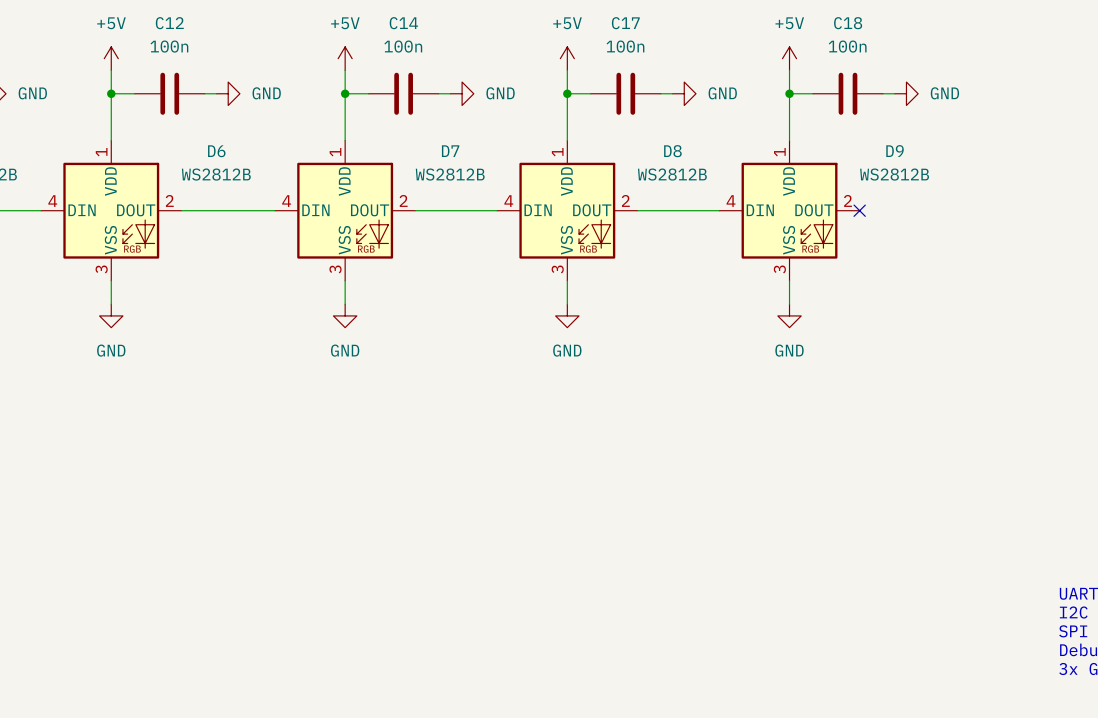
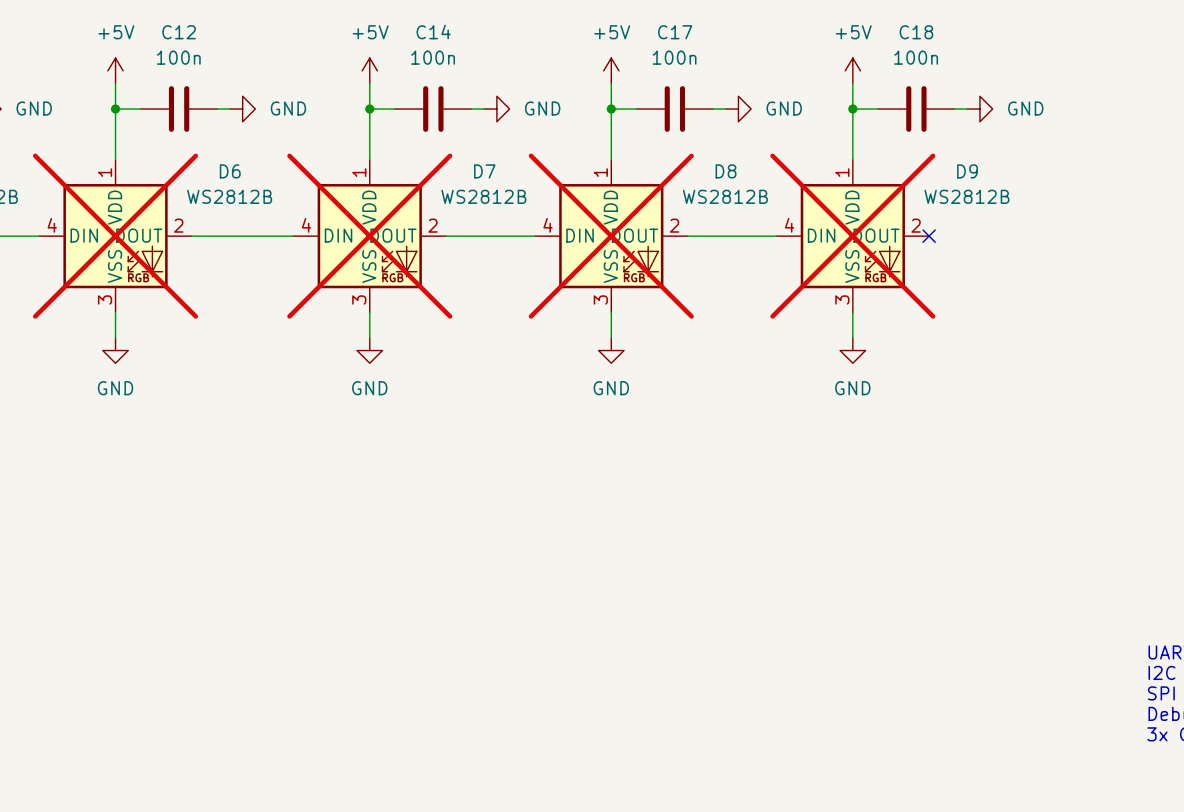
D6 do-not-place cross: none -> (115, 236)
D7 do-not-place cross: none -> (369, 236)
D8 do-not-place cross: none -> (611, 236)
D9 do-not-place cross: none -> (852, 236)

